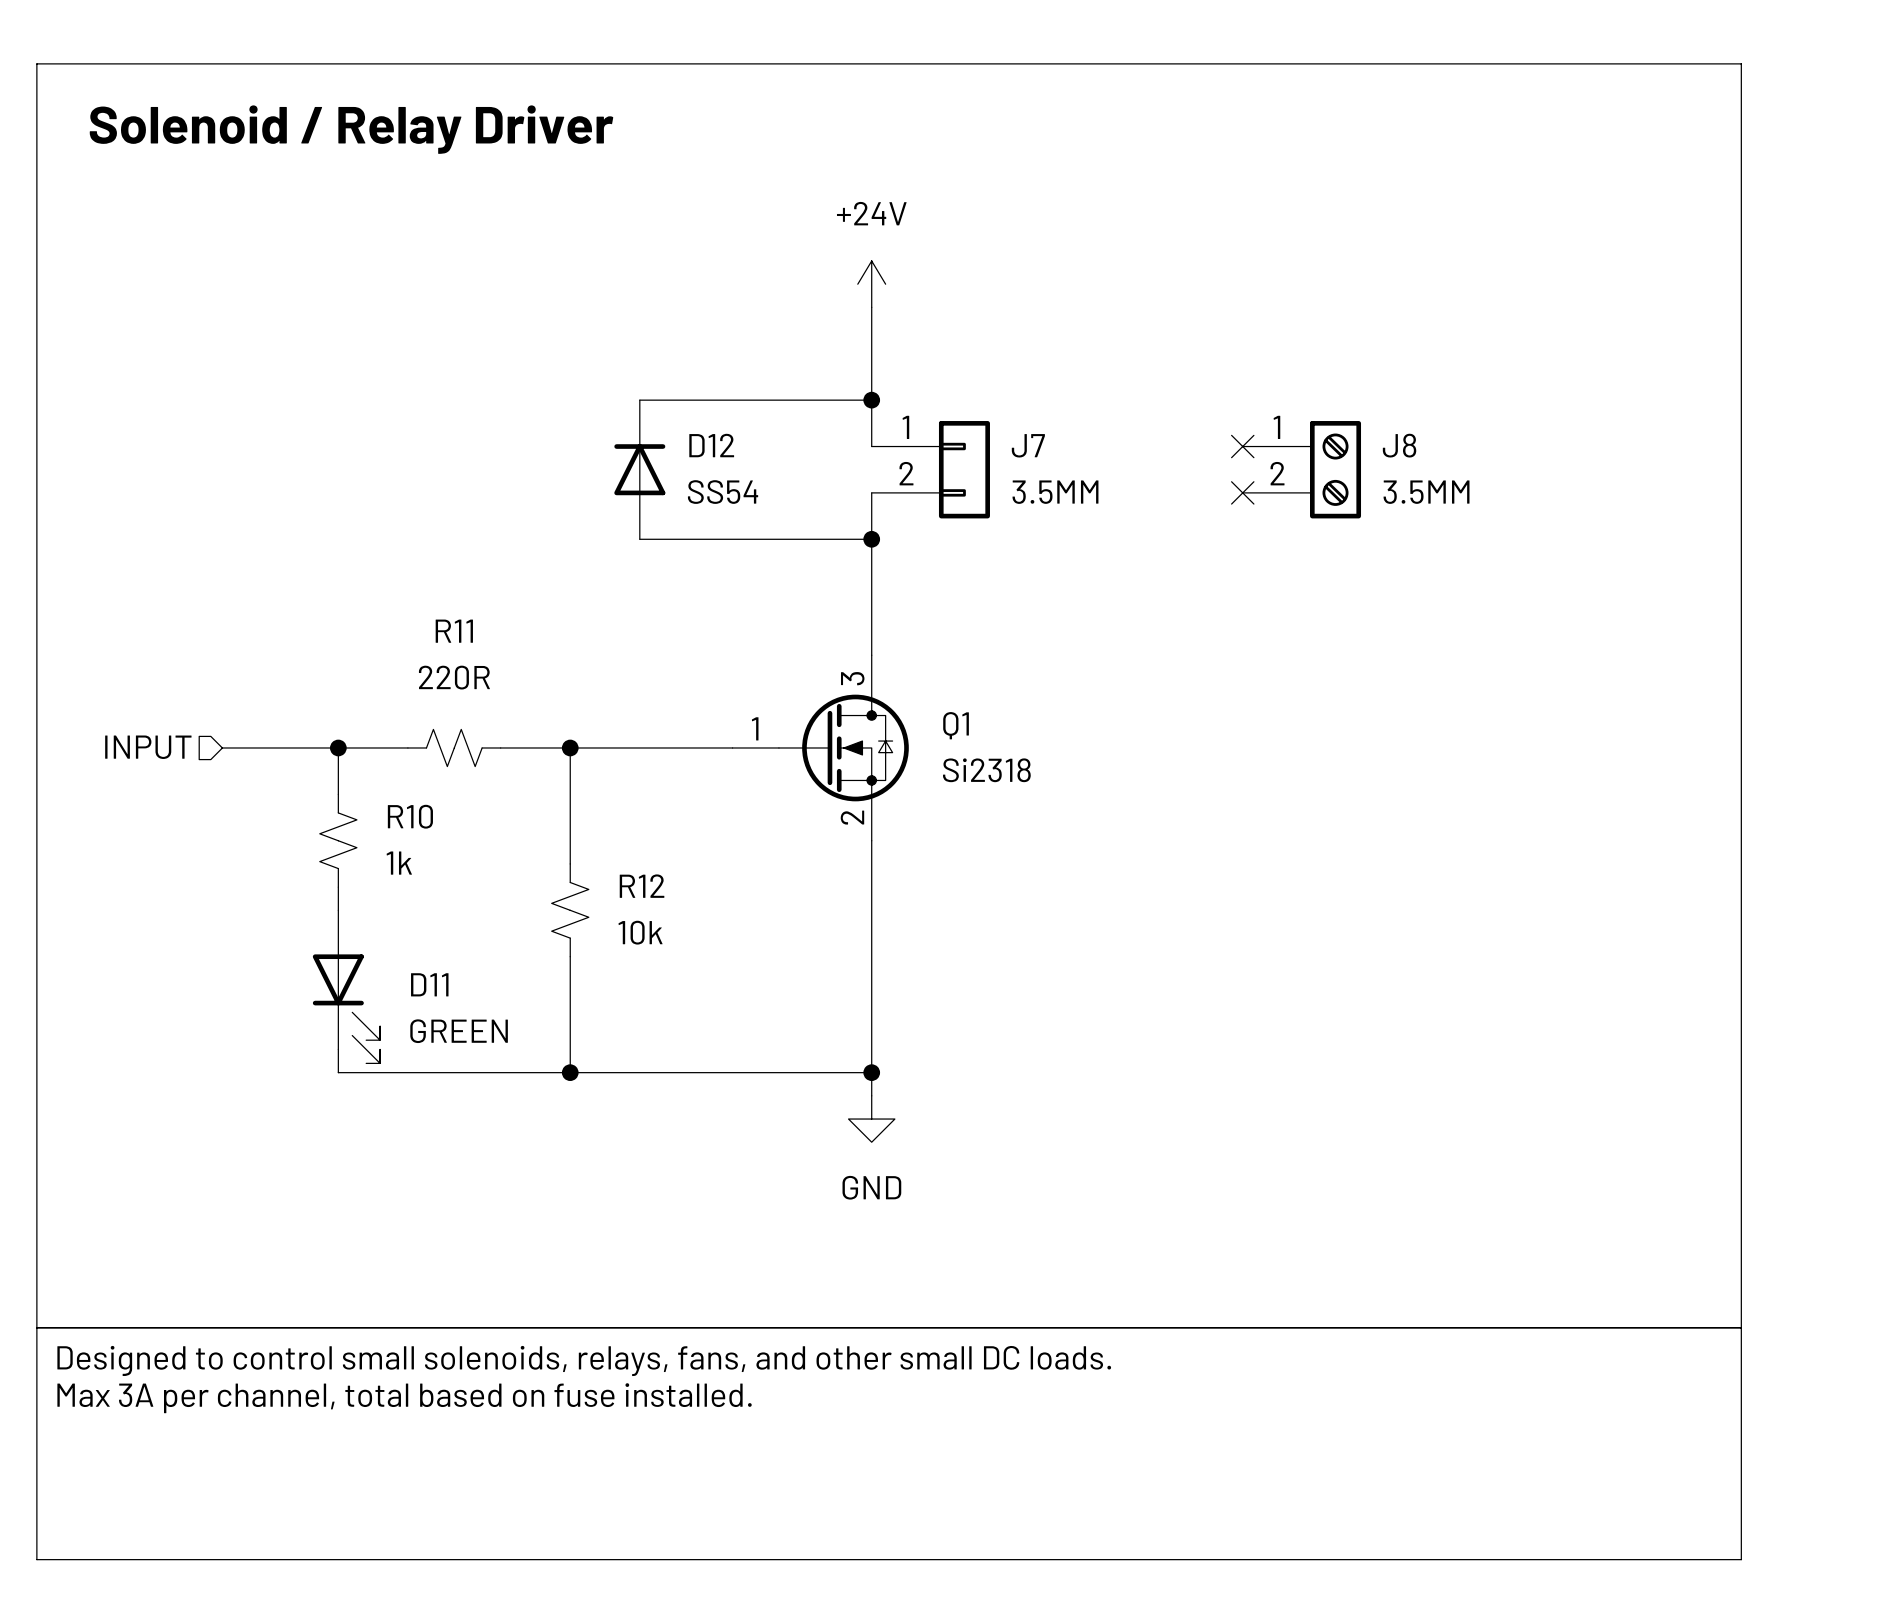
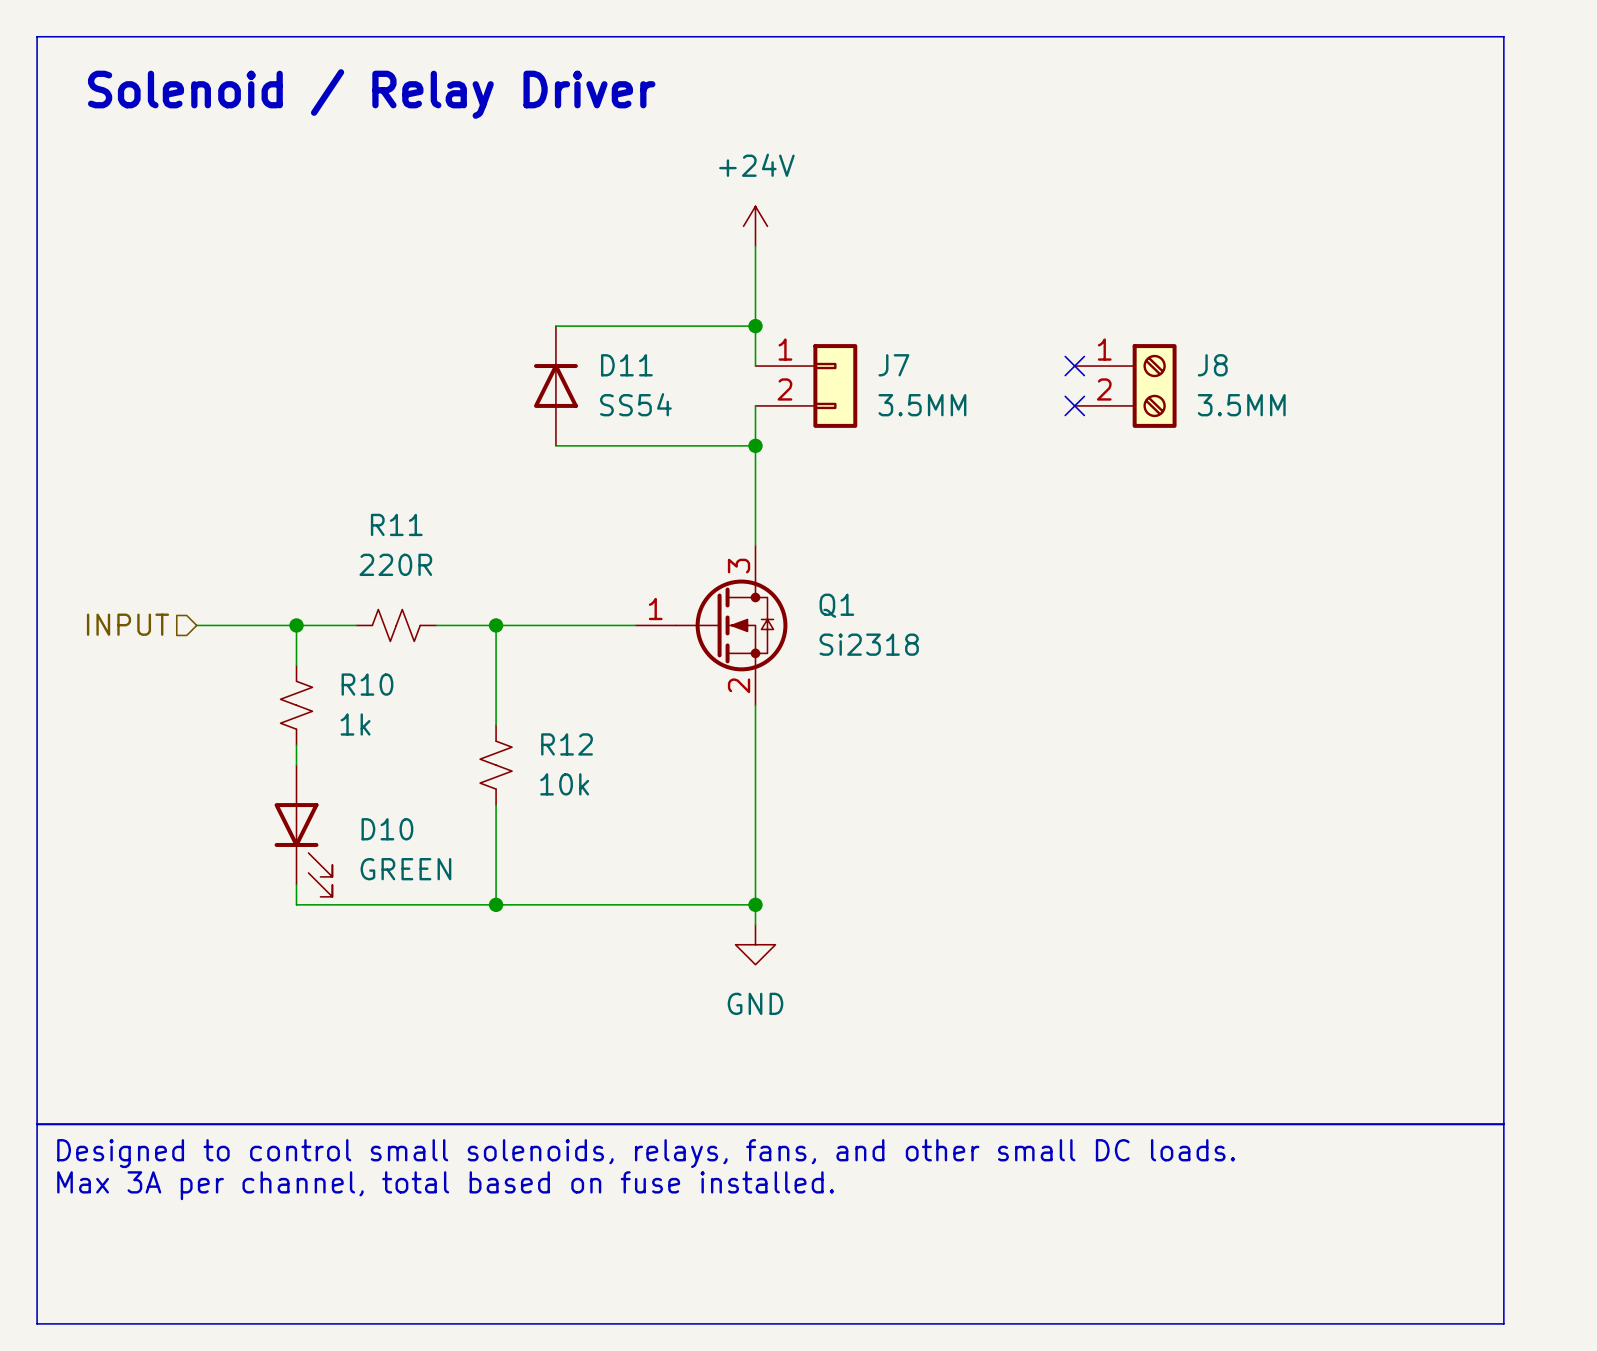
D12 name: D12 (711, 445) -> D11 (626, 365)
D11 name: D11 (429, 984) -> D10 (387, 829)

